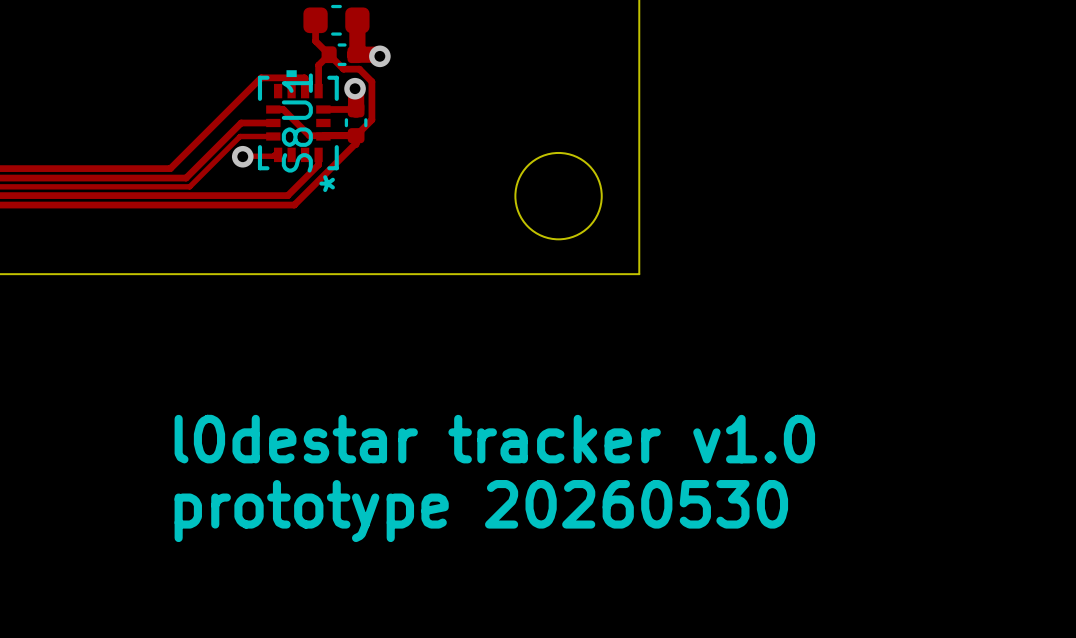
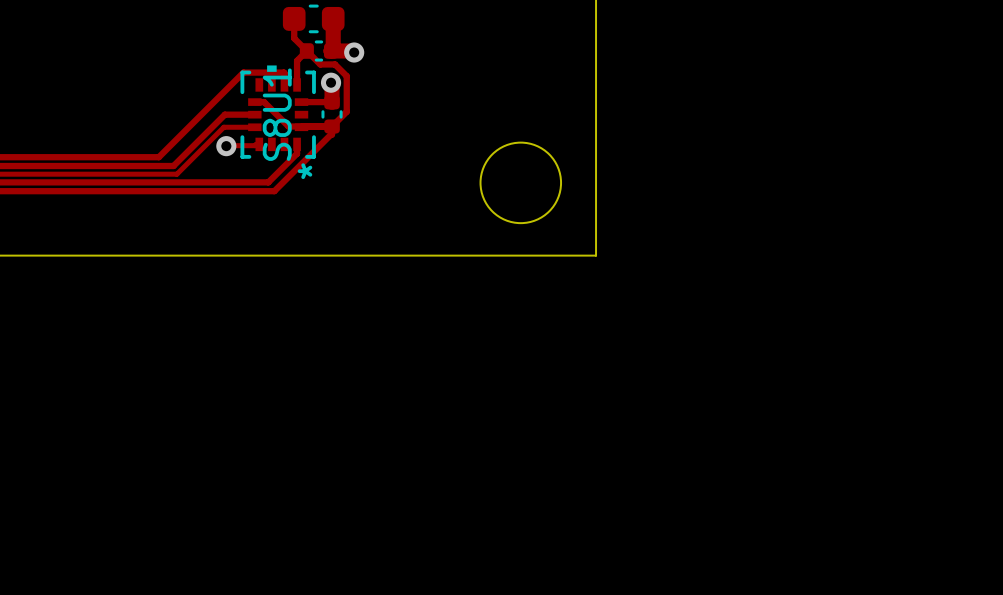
text: l0destar tracker v1.0 (494, 439) -> none
text: prototype 20260530 (481, 511) -> none

